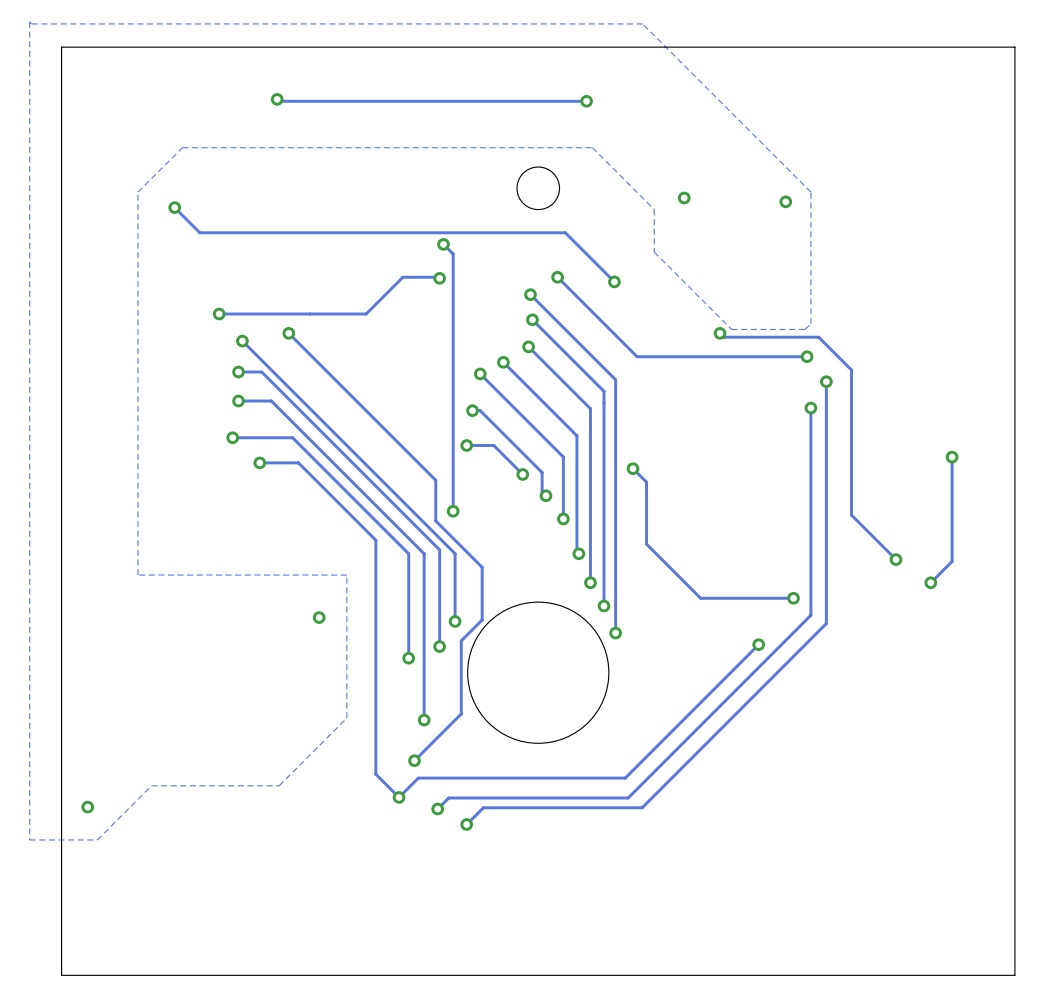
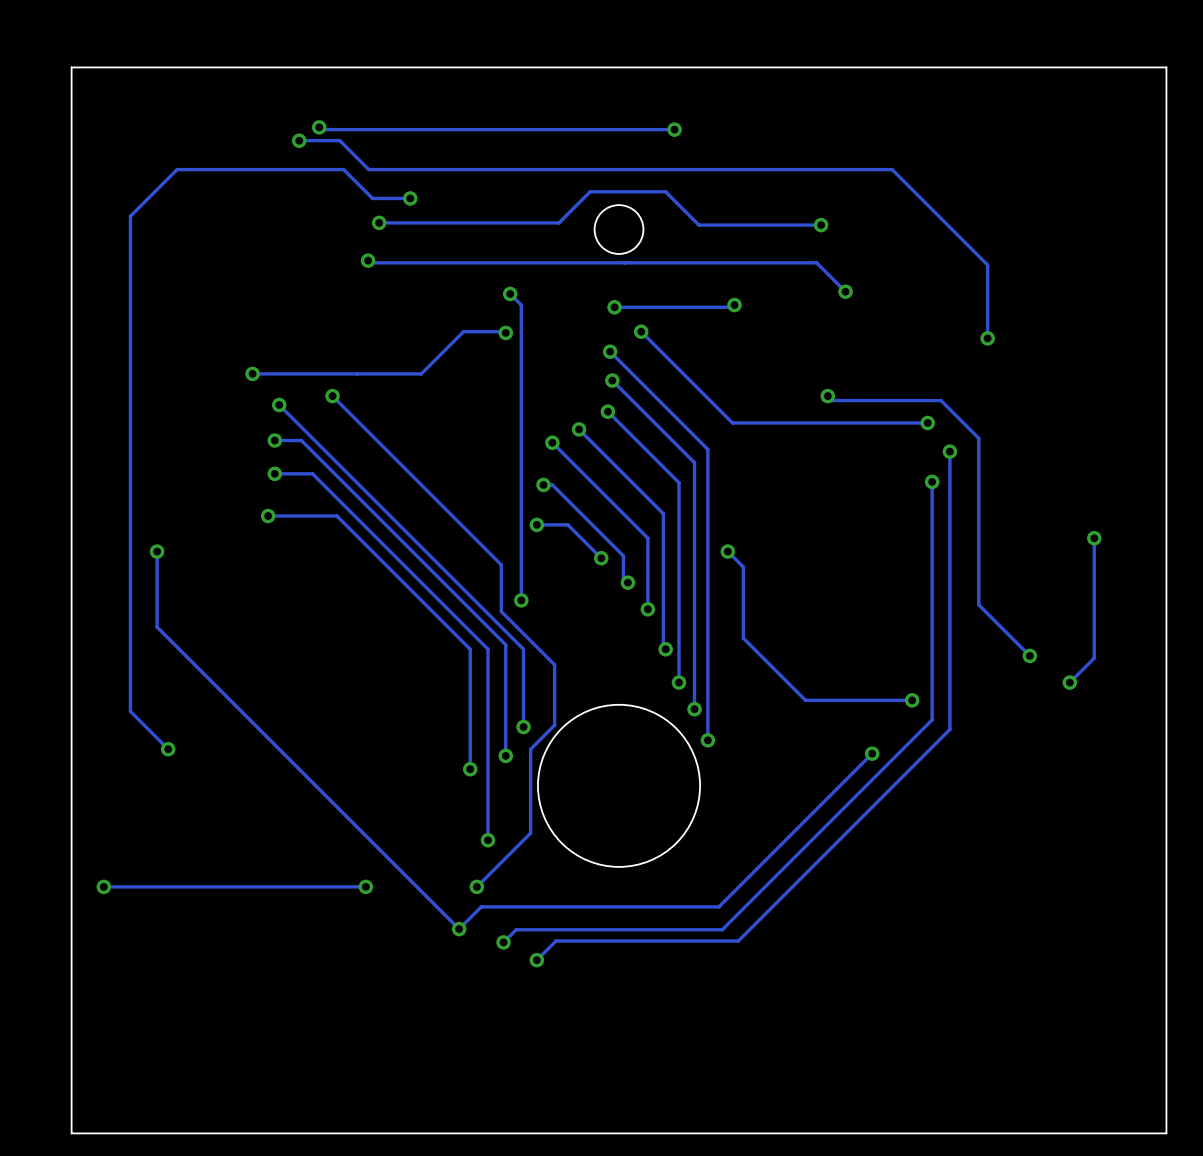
zone outline: (29, 22) (31, 23) (642, 23) (810, 192) (810, 323) (805, 329) (731, 329) (654, 252) (654, 209) (592, 147) (182, 147) (137, 192) (137, 575) (346, 575) (346, 718) (279, 785) (151, 785) (97, 839) (29, 839) (29, 22) -> none
track: none -> (299, 140) (339, 140) (368, 169) (892, 169) (987, 265) (987, 338)
via: none -> (299, 140)
track: none -> (410, 198) (372, 198) (343, 169) (177, 169) (130, 216) (130, 711) (168, 749)
via: none -> (410, 198)
track: none -> (379, 222) (559, 222) (590, 191) (665, 191) (698, 225) (821, 225)
via: none -> (379, 222)
via position: (684, 197) -> (821, 225)
via: (785, 201) -> none
track: (174, 207) (199, 232) (565, 232) (614, 281) -> none
via: (174, 207) -> none
track: none -> (368, 260) (370, 262) (816, 262) (845, 291)
via: none -> (368, 260)
via: none -> (845, 291)
track: none -> (734, 305) (734, 307) (614, 307)
via: none -> (734, 305)
via: none -> (614, 307)
via: (614, 281) -> none
via: none -> (987, 338)
track: (259, 462) (298, 462) (375, 540) (375, 774) -> (157, 551) (157, 627) (432, 902)
via: (259, 462) -> none
via: none -> (157, 551)
via: (319, 617) -> none
via: none -> (168, 749)
track: none -> (365, 886) (103, 886)
via: none -> (365, 886)
via position: (87, 807) -> (103, 886)

